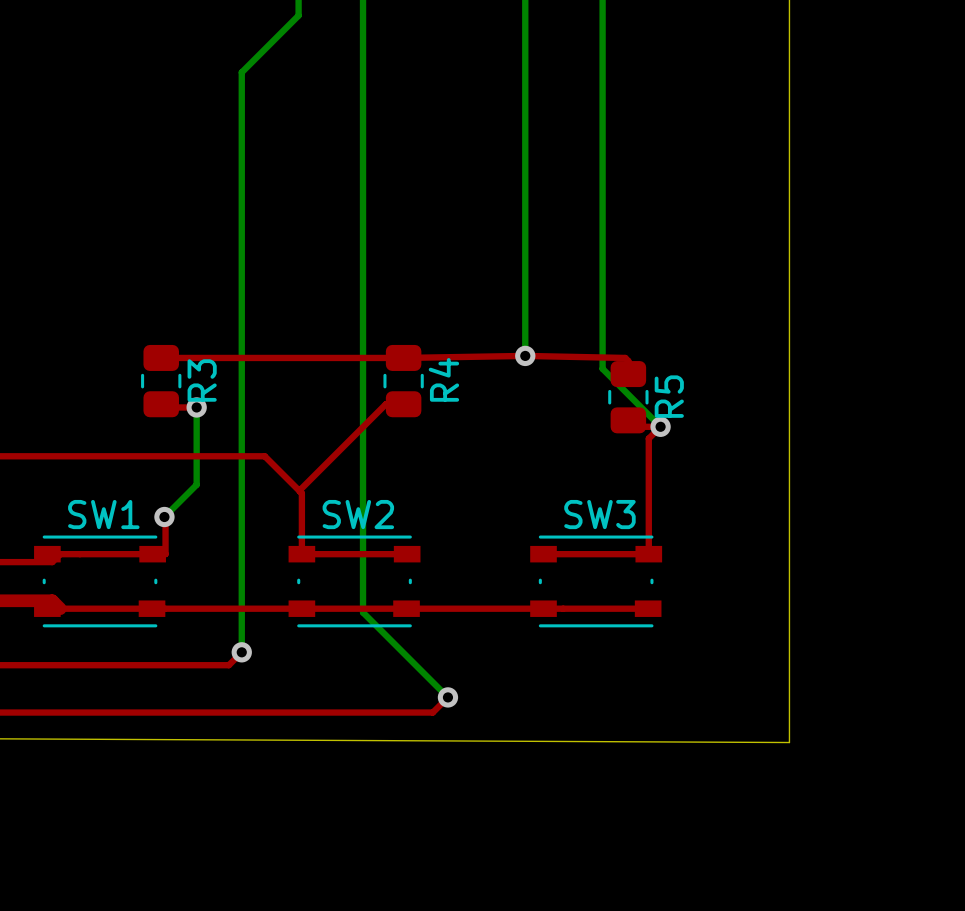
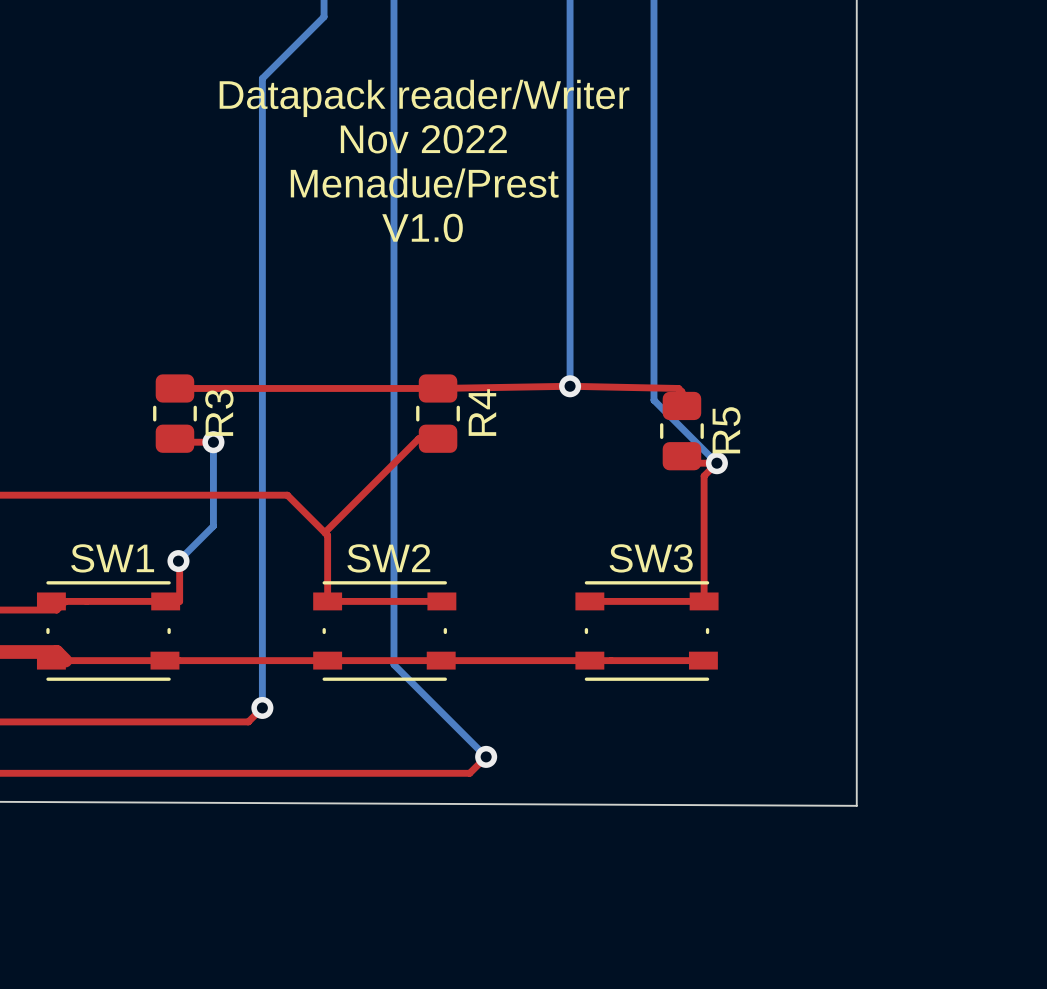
text: none -> Datapack reader/Writer (424, 98)
text: none -> Nov 2022 (423, 139)
text: none -> Menadue/Prest (424, 183)
text: none -> V1.0 (422, 227)

